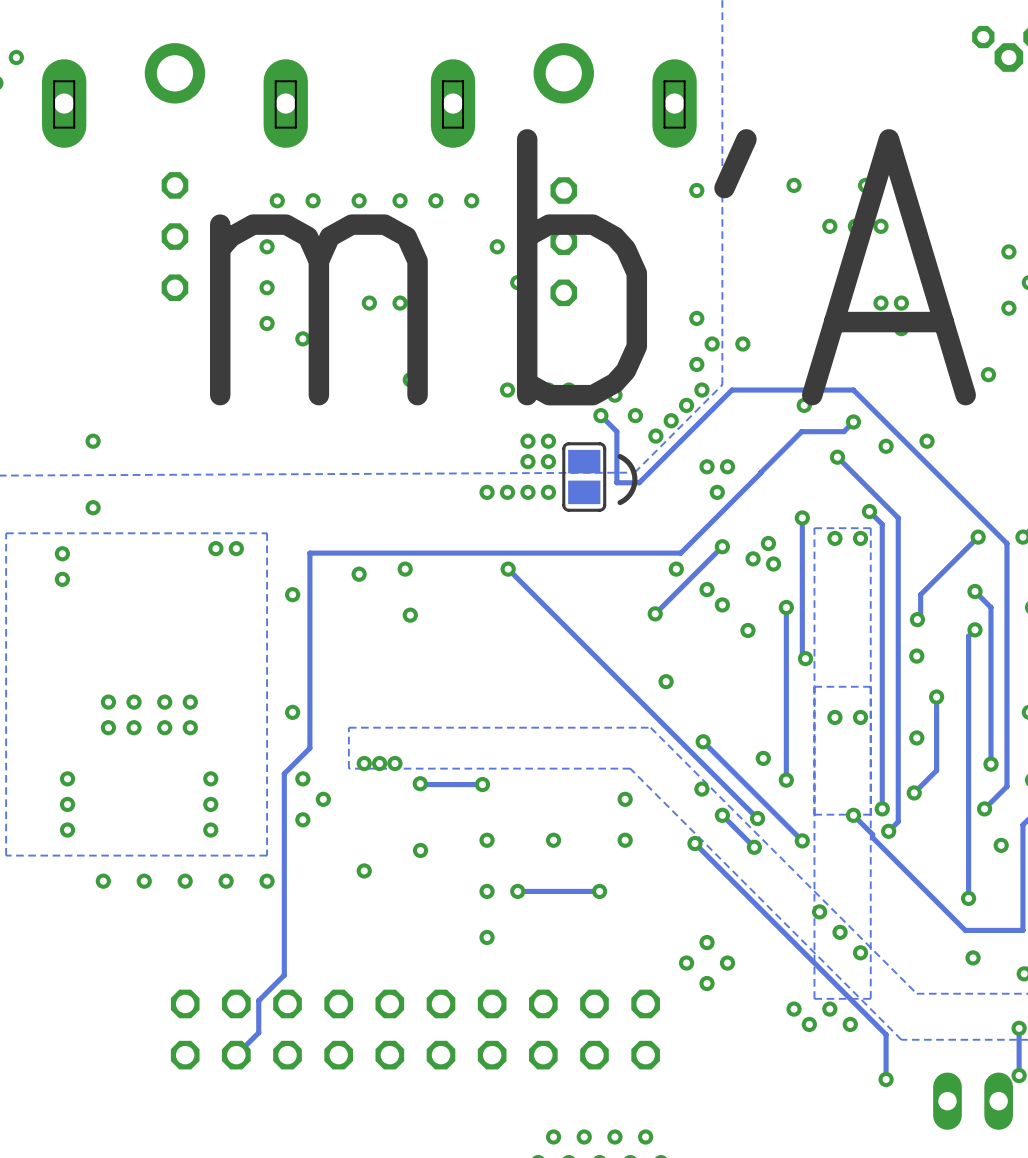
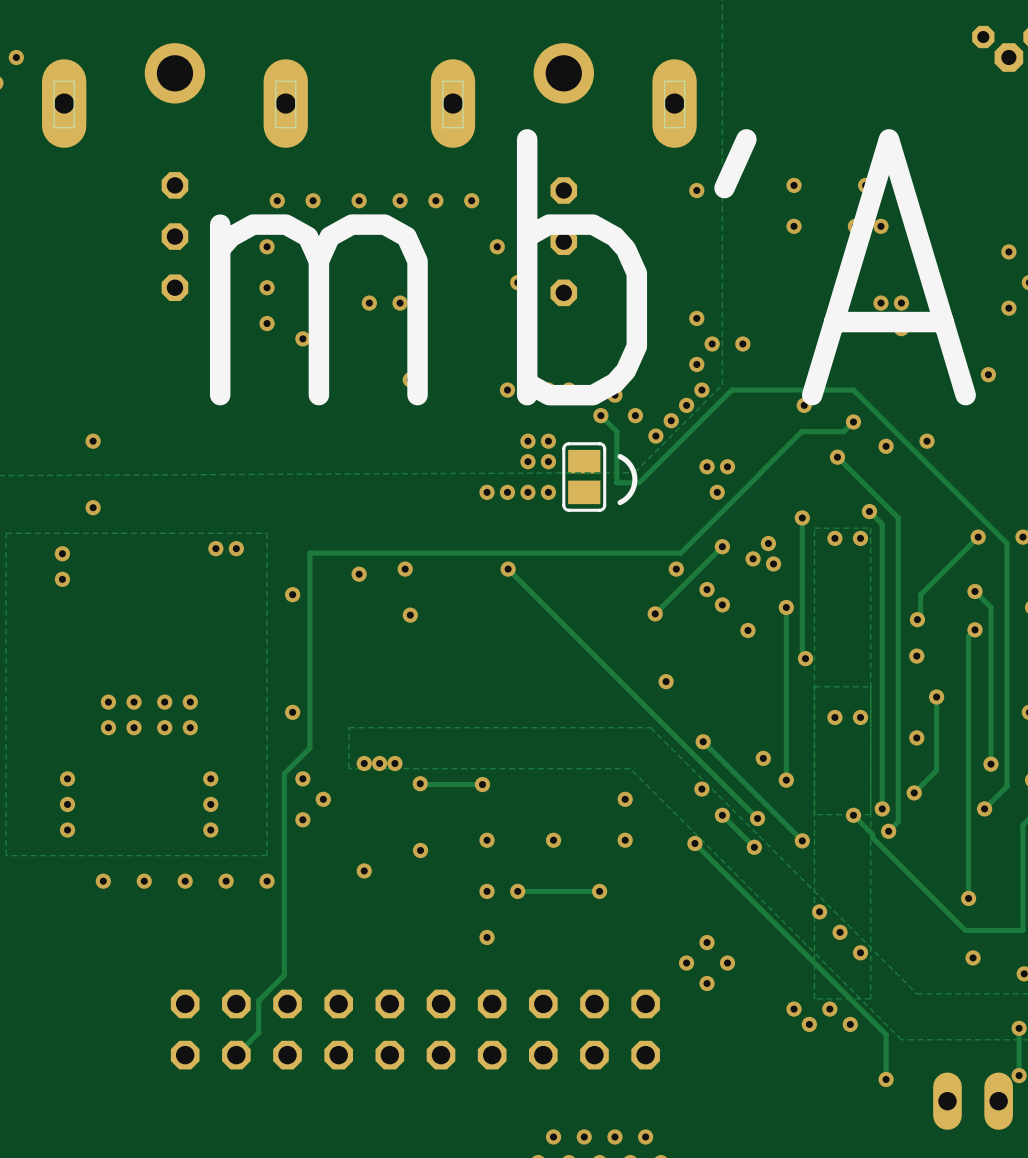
via position: (829, 226) -> (794, 226)
via: (1001, 845) -> none

